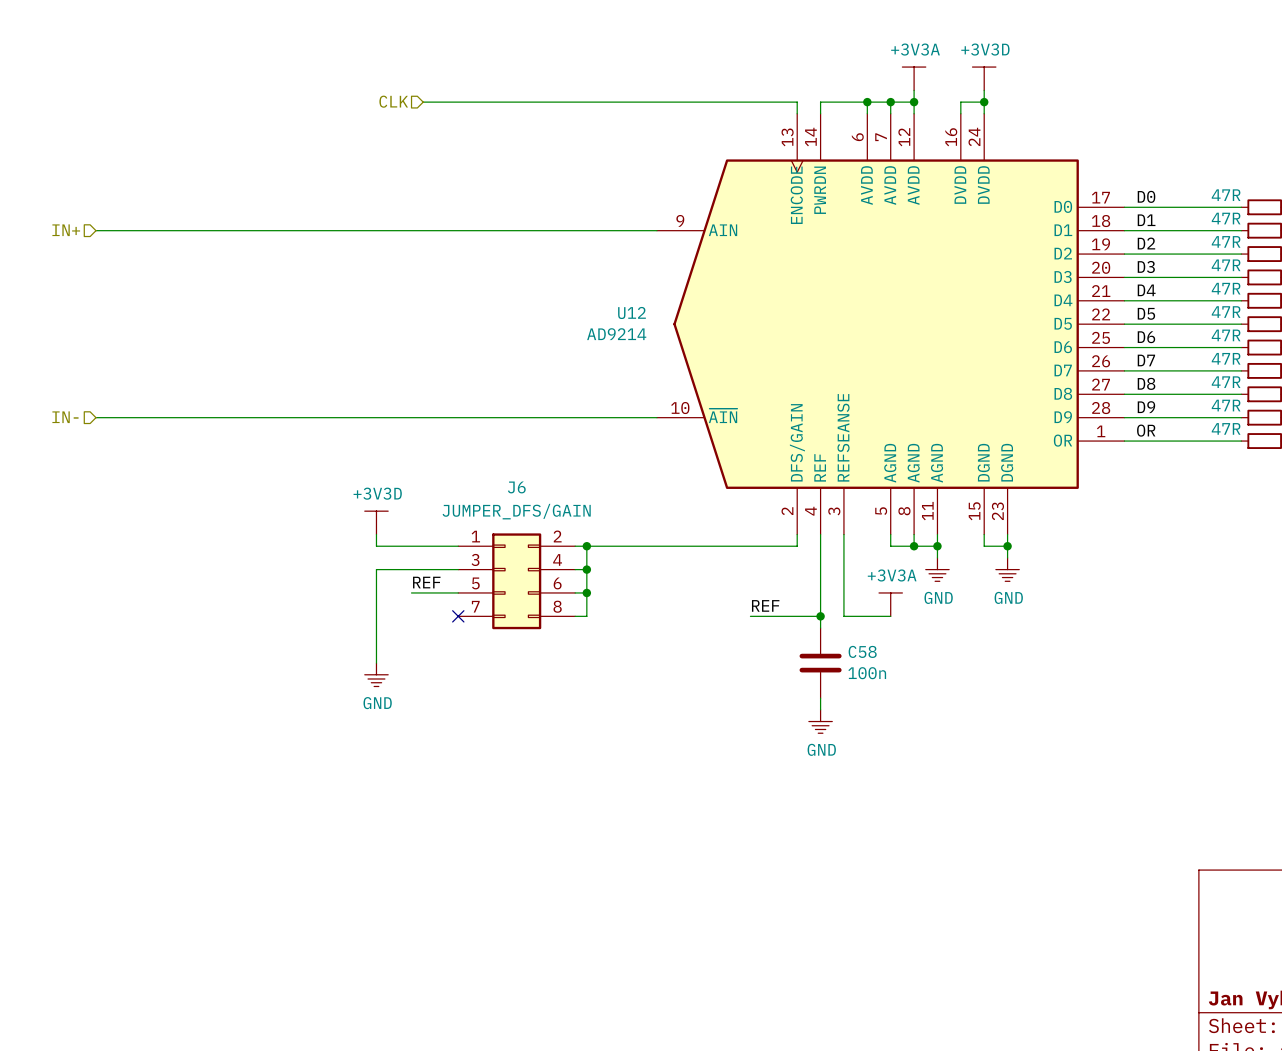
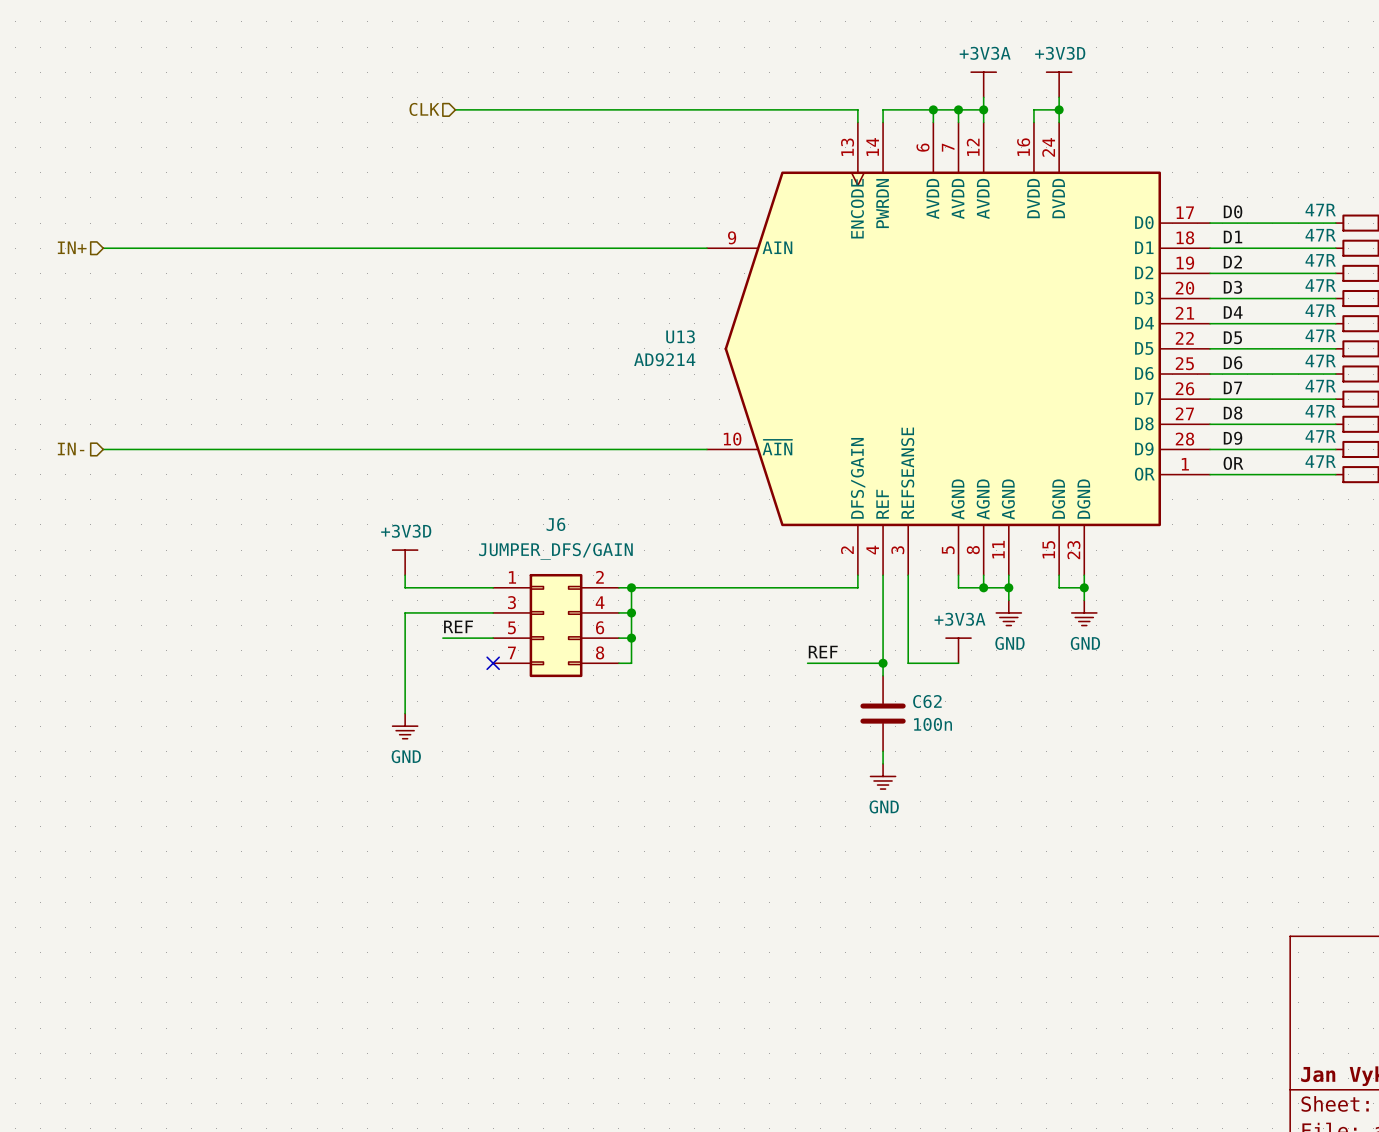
U12 name: U12 (631, 312) -> U13 (680, 336)
C58 name: C58 (862, 651) -> C62 (927, 701)

